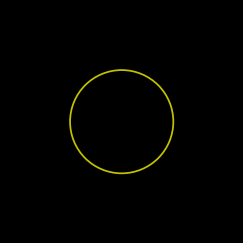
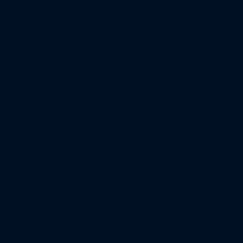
round board edge: [70, 70, 174, 174] -> none

